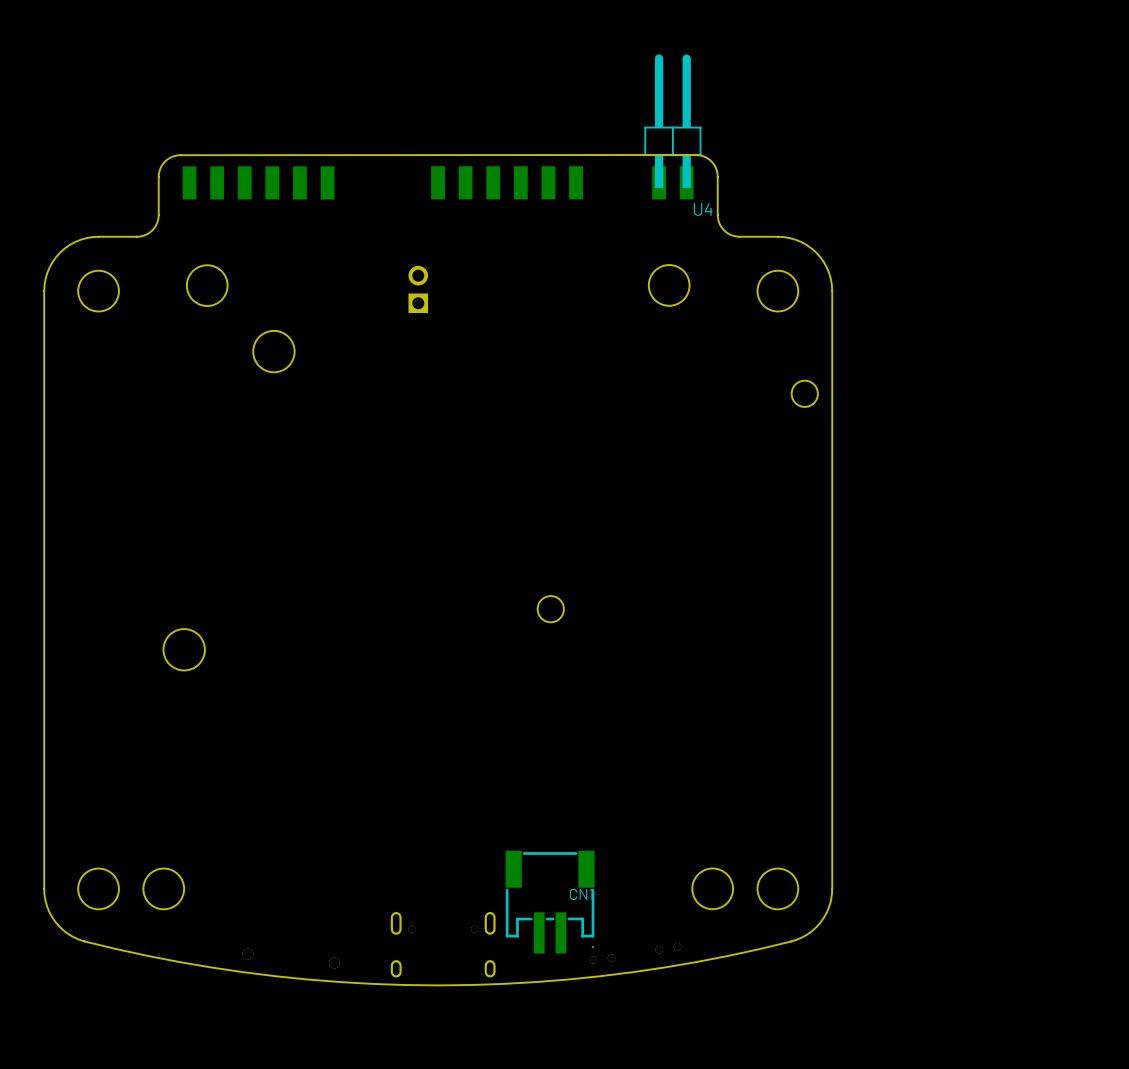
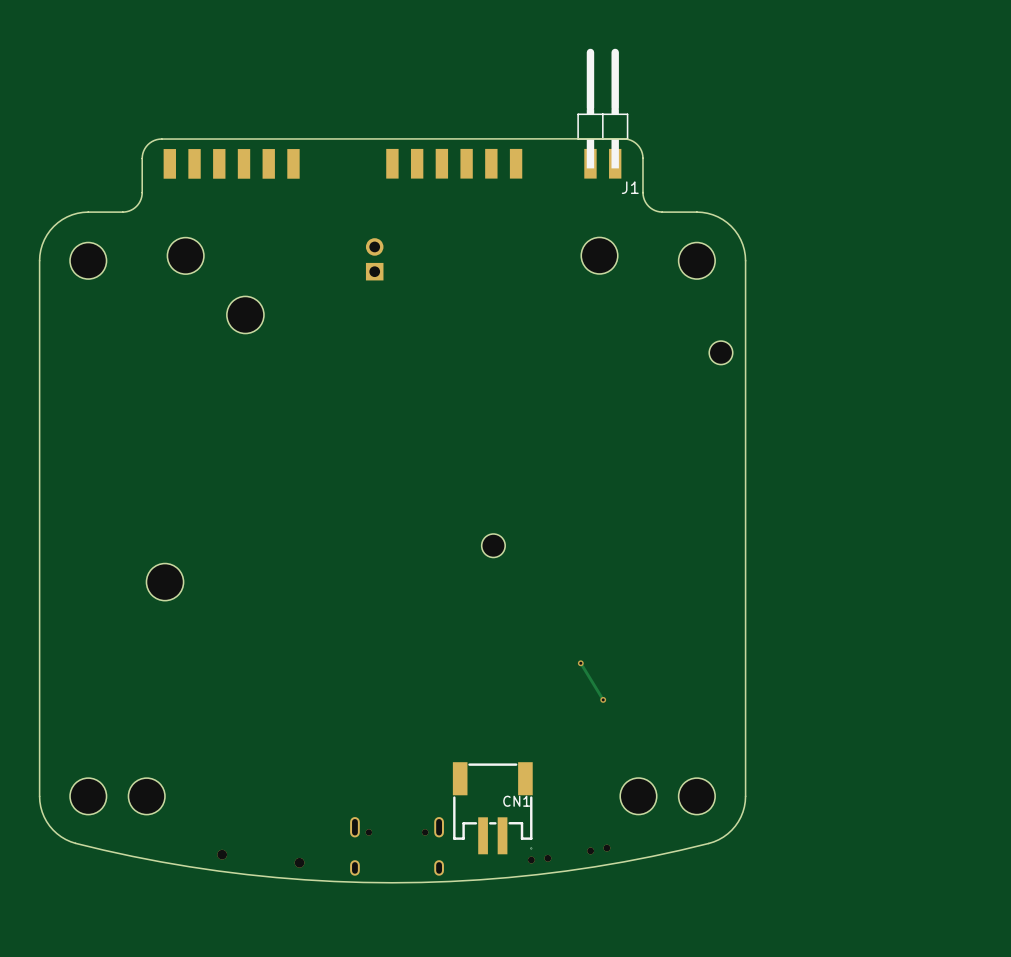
U4 name: U4 (703, 209) -> J1 (630, 187)
track: none -> (580, 663) (603, 699)
via: none -> (580, 663)
via: none -> (603, 699)

